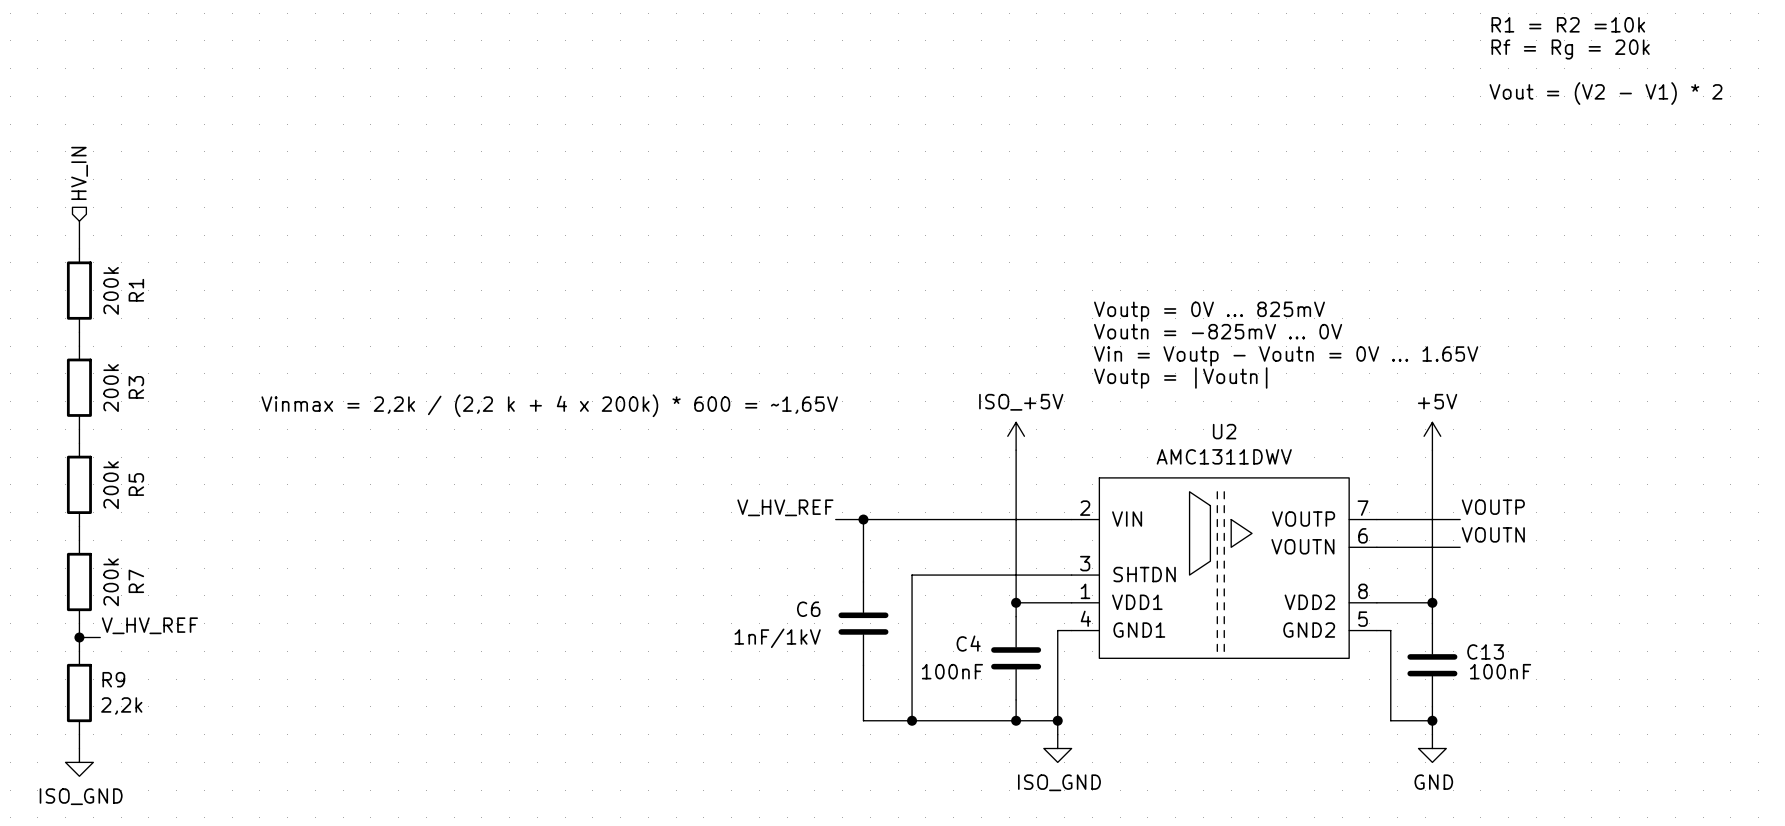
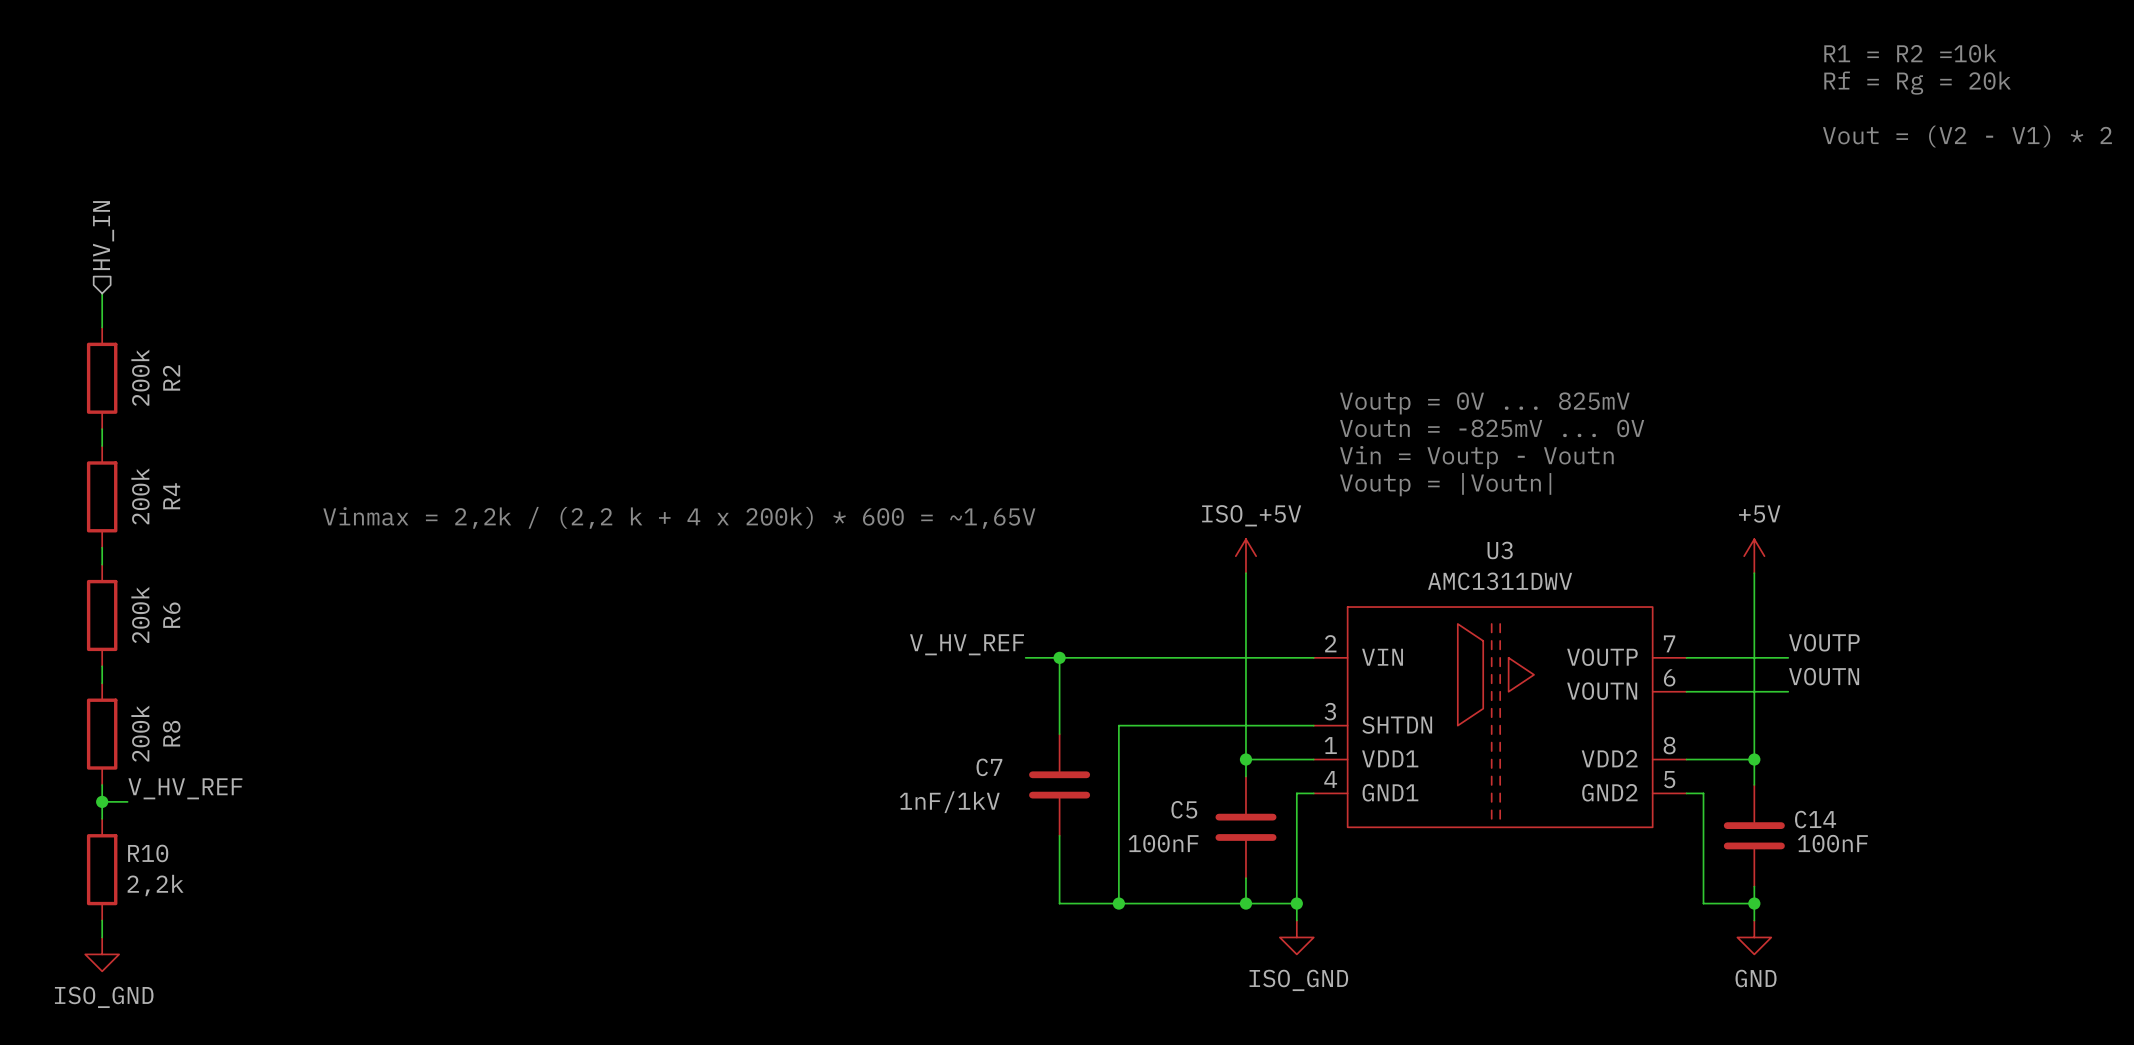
R1 name: R1 (136, 290) -> R2 (171, 377)
text: Vin = Voutp - Voutn = 0V ... 1.65V (1286, 356) -> Vin = Voutp - Voutn (1476, 457)
R3 name: R3 (136, 387) -> R4 (171, 496)
U2 name: U2 (1224, 431) -> U3 (1500, 550)
R5 name: R5 (136, 484) -> R6 (171, 615)
R7 name: R7 (136, 581) -> R8 (171, 733)
C6 name: C6 (808, 609) -> C7 (989, 767)
C4 name: C4 (968, 643) -> C5 (1184, 809)
C13 name: C13 (1485, 651) -> C14 (1815, 819)
R9 name: R9 (113, 679) -> R10 (148, 853)

